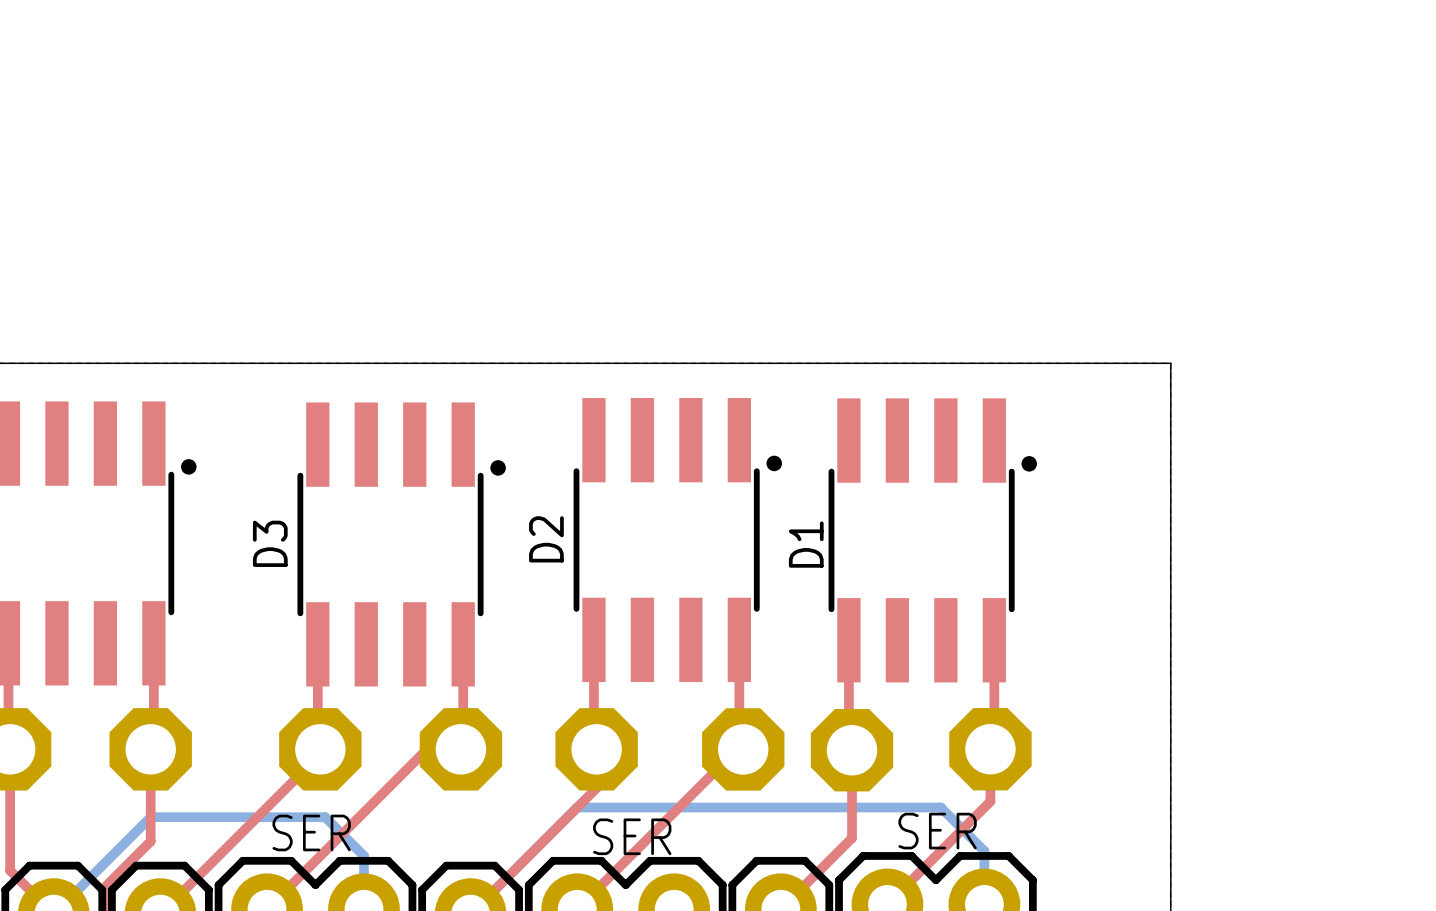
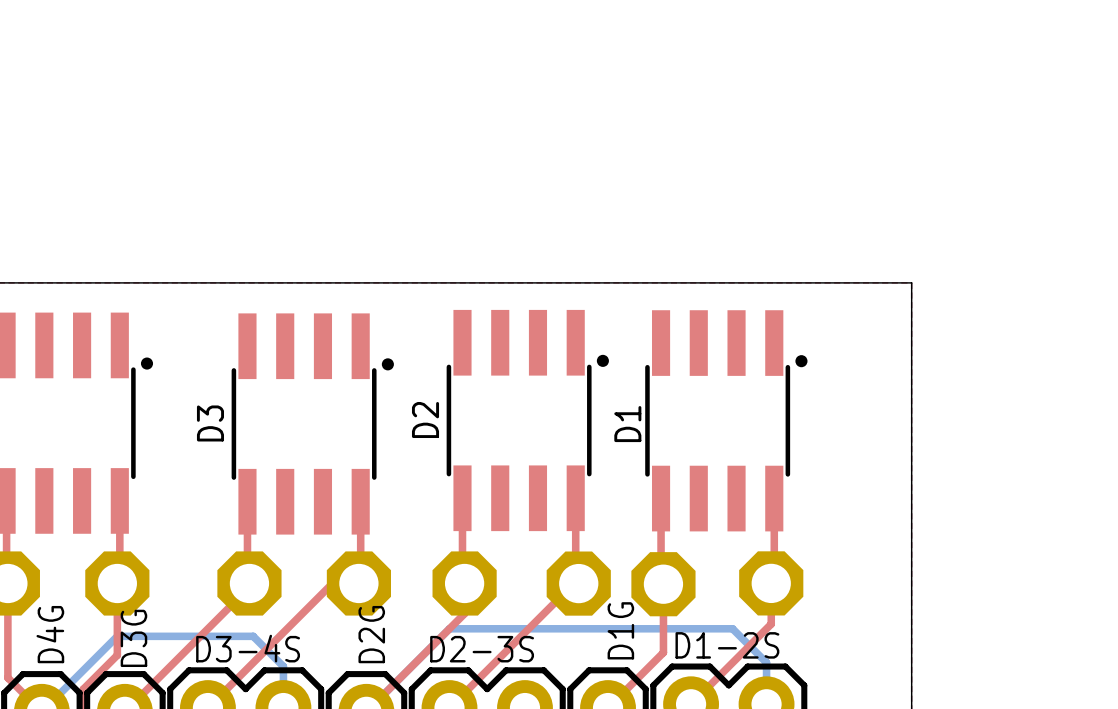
D1G name: none -> D1G (620, 630)
D4G name: none -> D4G (50, 634)
D2G name: none -> D2G (371, 634)
D3G name: none -> D3G (133, 638)
D1-2S name: none -> D1-2S (727, 645)
text: SER (937, 831) -> none
text: SER (311, 832) -> none
D3-4S name: none -> D3-4S (248, 648)
D2-3S name: none -> D2-3S (482, 649)
text: SER (632, 836) -> none

